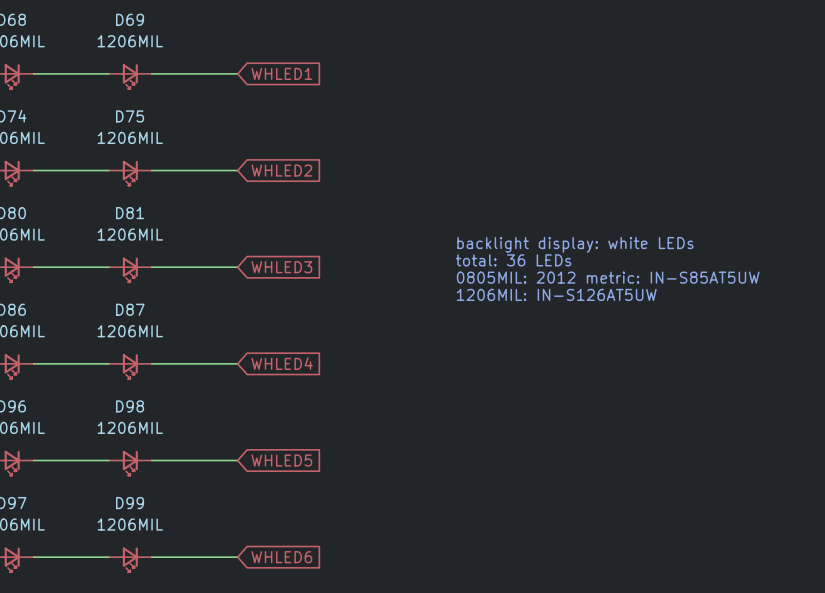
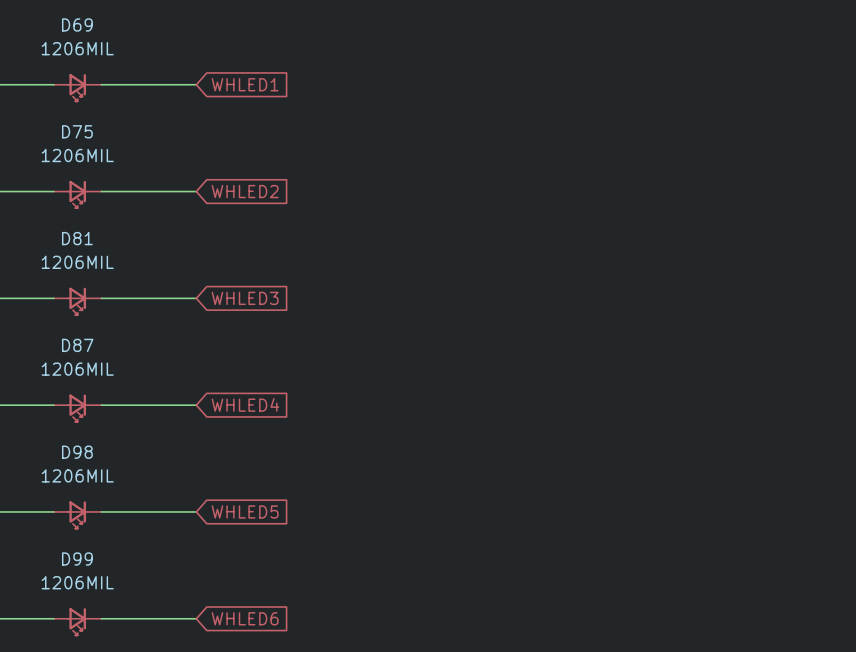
text: backlight display: white LEDs (575, 244) -> none
text: total: 36 LEDs (513, 260) -> none
text: 0805MIL: 2012 metric: IN-S85AT5UW (608, 277) -> none
text: 1206MIL: IN-S126AT5UW (556, 294) -> none

